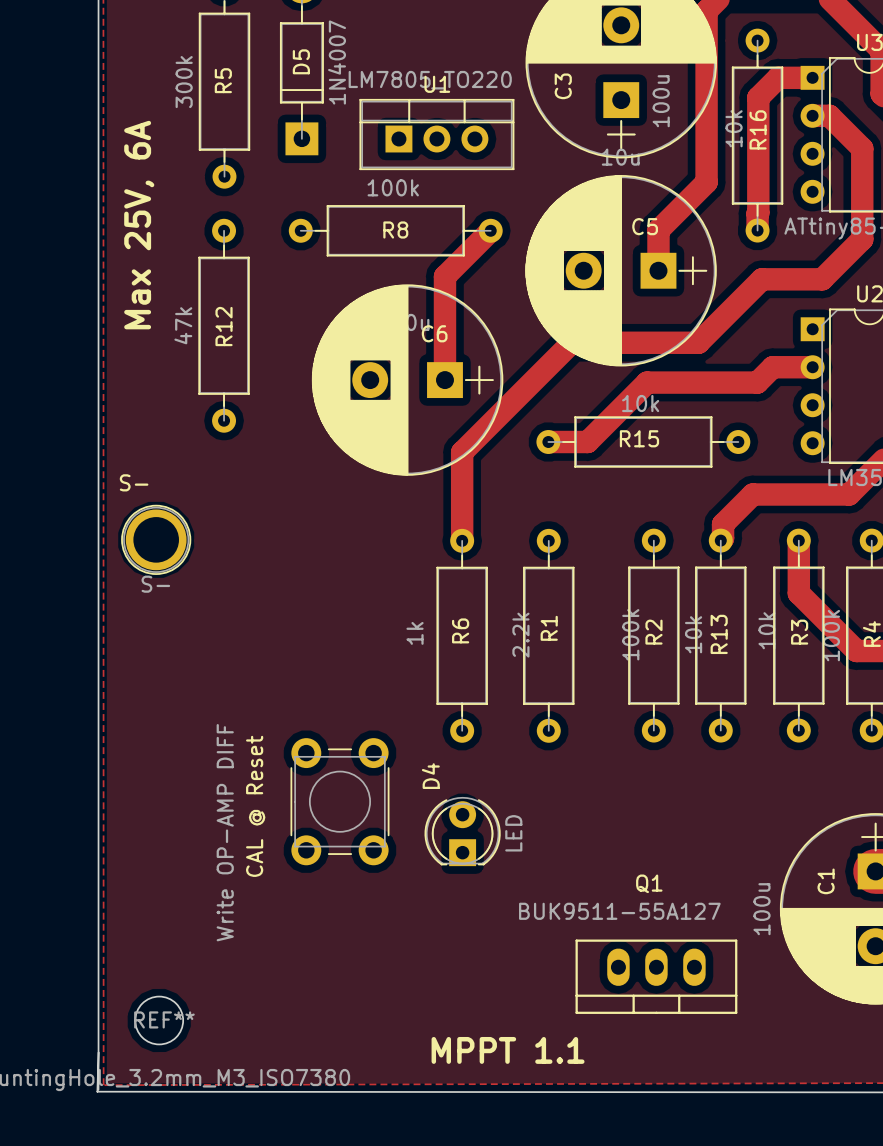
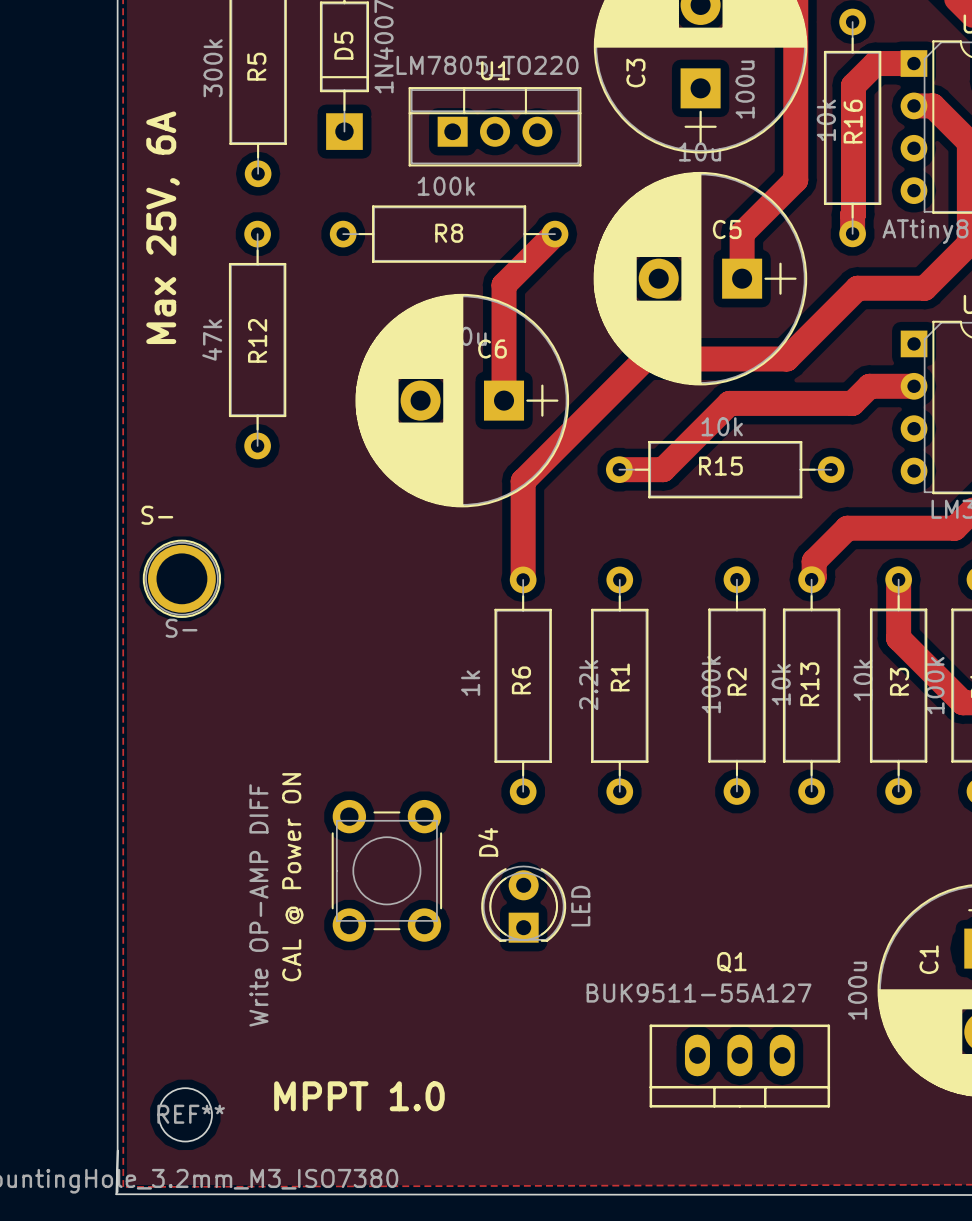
CAL @ Reset name: CAL @ Reset (255, 806) -> CAL @ Power ON (292, 877)
text: none -> MPPT 1.0 (359, 1096)
text: MPPT 1.1 (508, 1050) -> none

